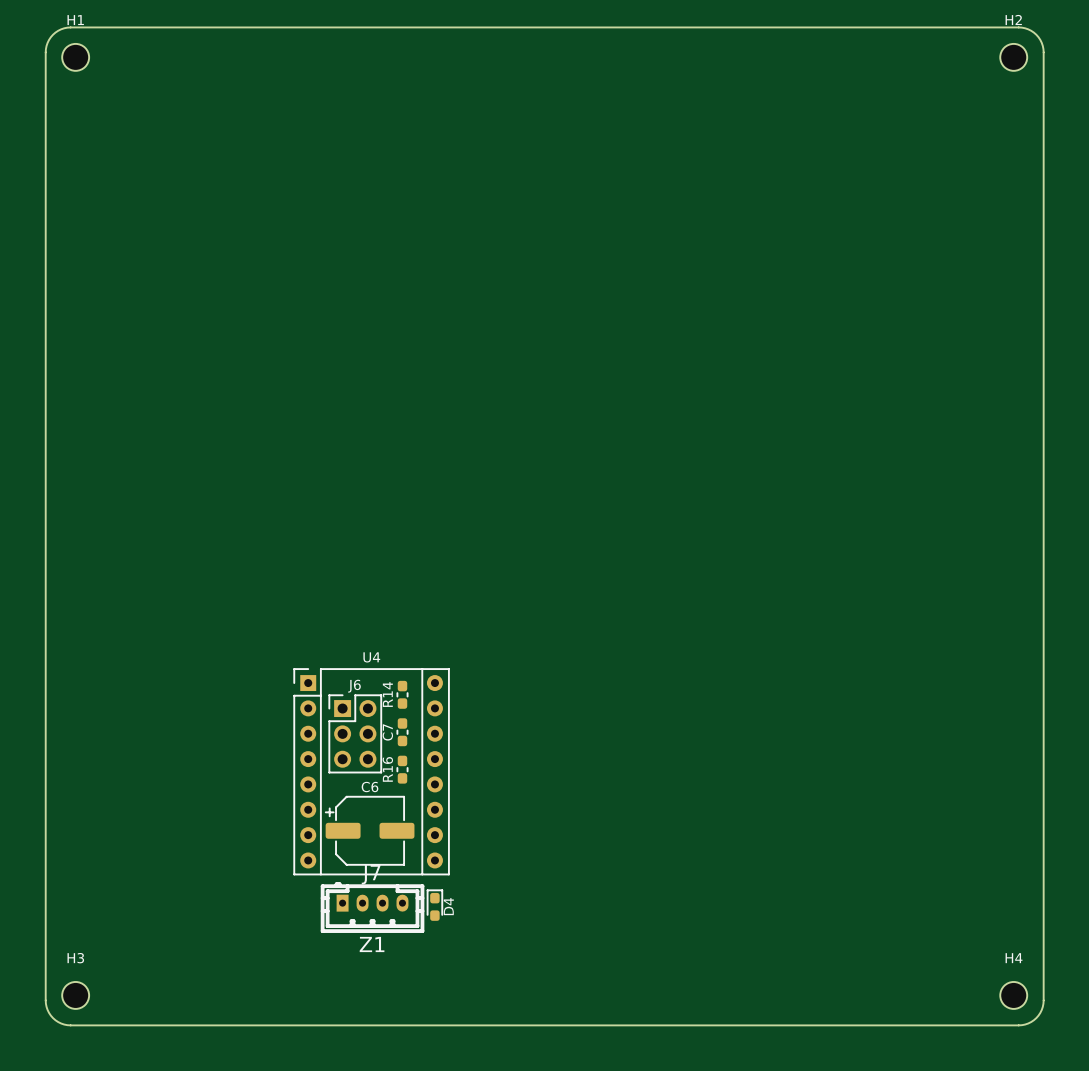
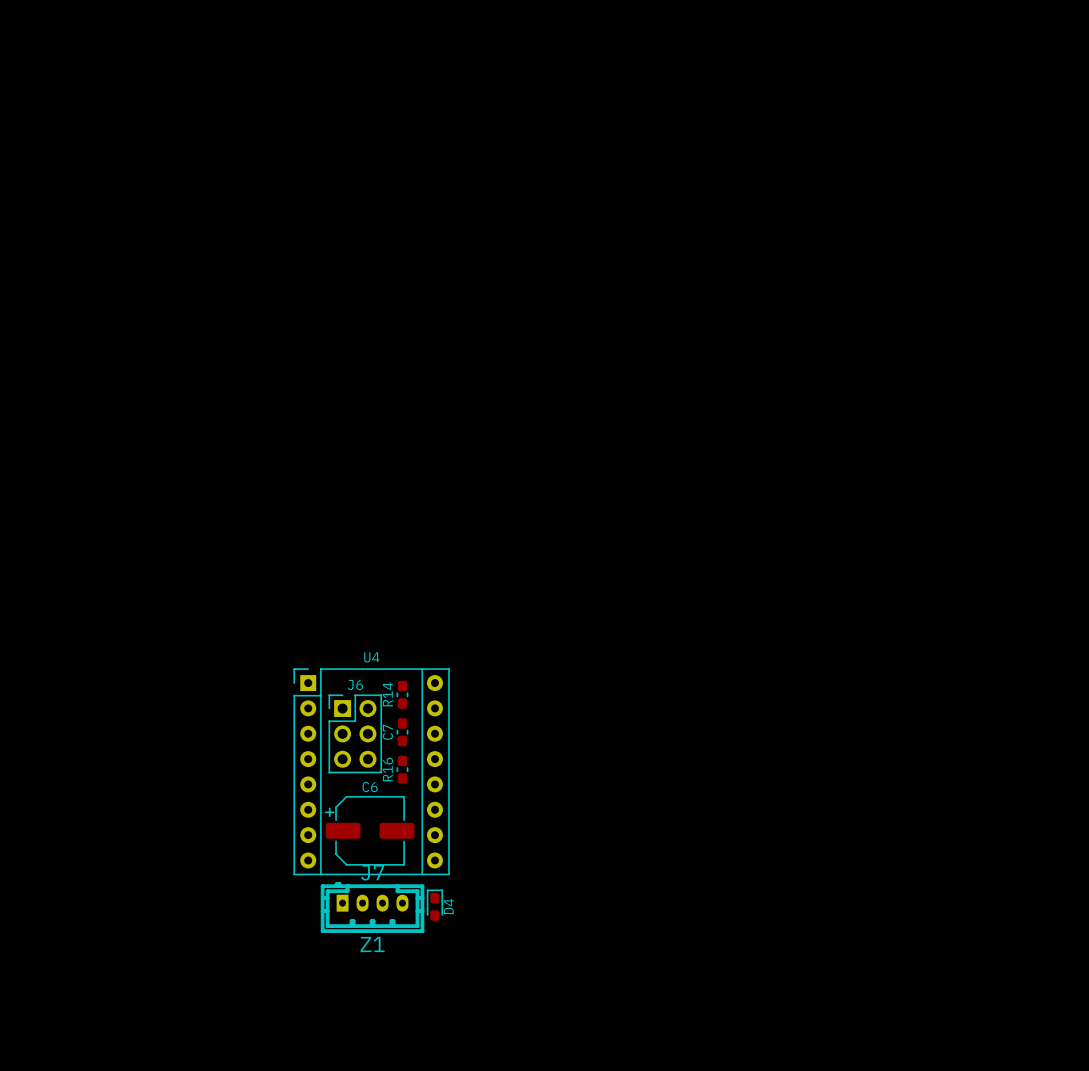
board edge: (70, 27) (1018, 27) (1028, 29) (1036, 34) (1041, 42) (1043, 52) (1043, 1000) (1041, 1009) (1036, 1018) (1028, 1023) (1018, 1025) (70, 1025) (61, 1023) (53, 1018) (47, 1009) (45, 1000) (45, 52) (47, 42) (53, 34) (61, 29) (70, 27) -> none
H1: (75, 57) -> none
H2: (1013, 57) -> none
H3: (75, 995) -> none
H4: (1013, 995) -> none

